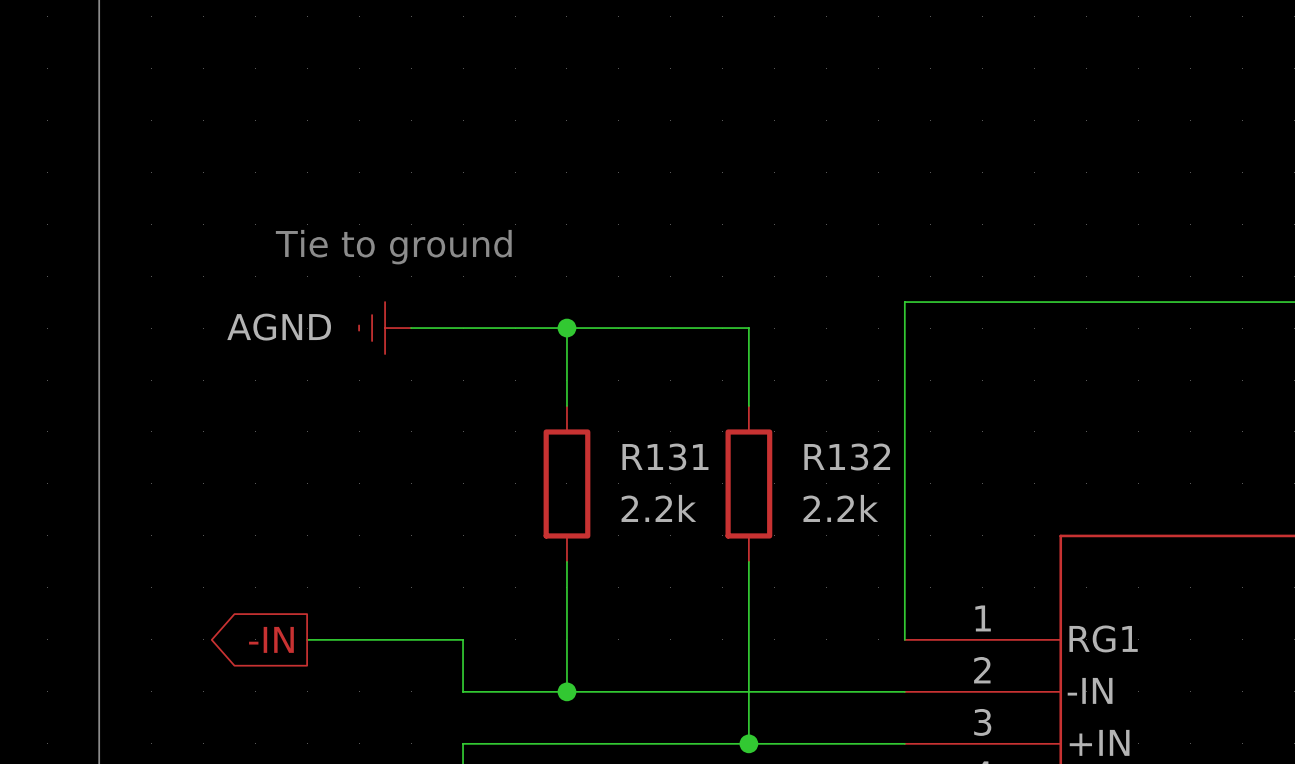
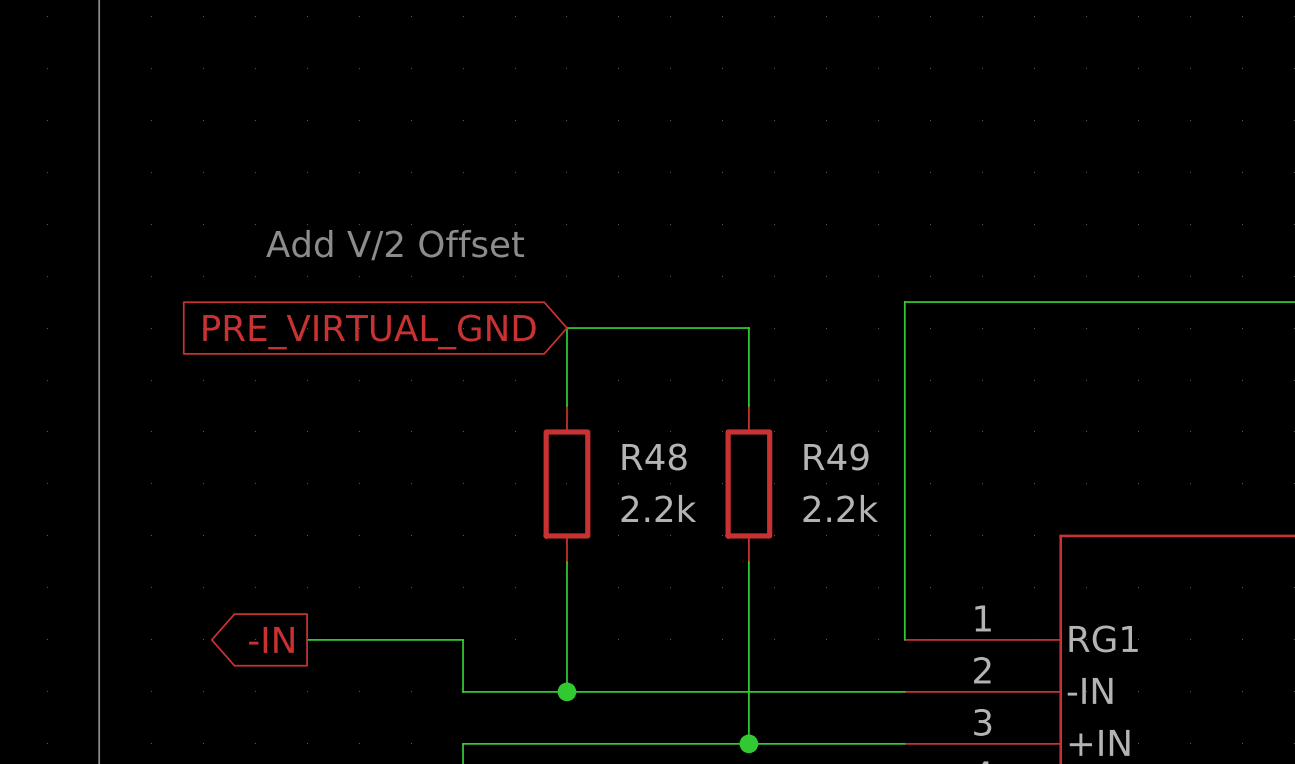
text: Tie to ground (393, 247) -> Add V/2 Offset (395, 245)
power symbol: AGND (385, 328) -> none
wire: (411, 328) (566, 328) -> none
junction: (566, 328) -> none
global label: none -> PRE_VIRTUAL_GND (369, 332)
R131 name: R131 (665, 457) -> R48 (654, 457)
R132 name: R132 (847, 457) -> R49 (836, 457)

